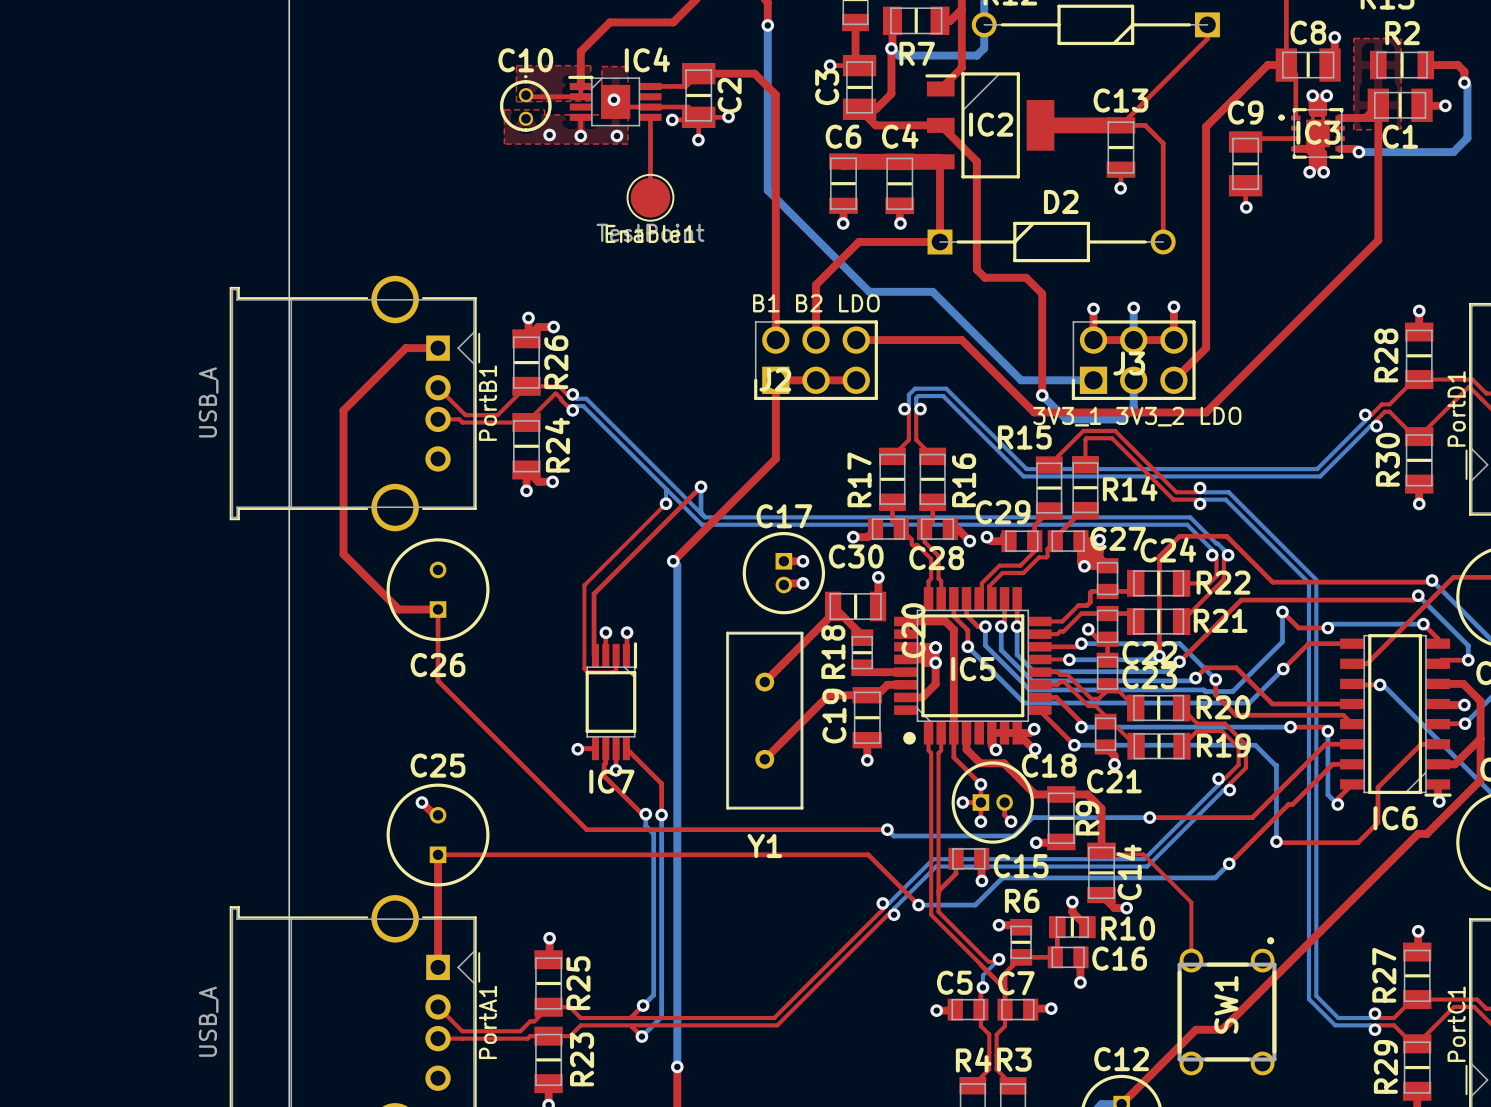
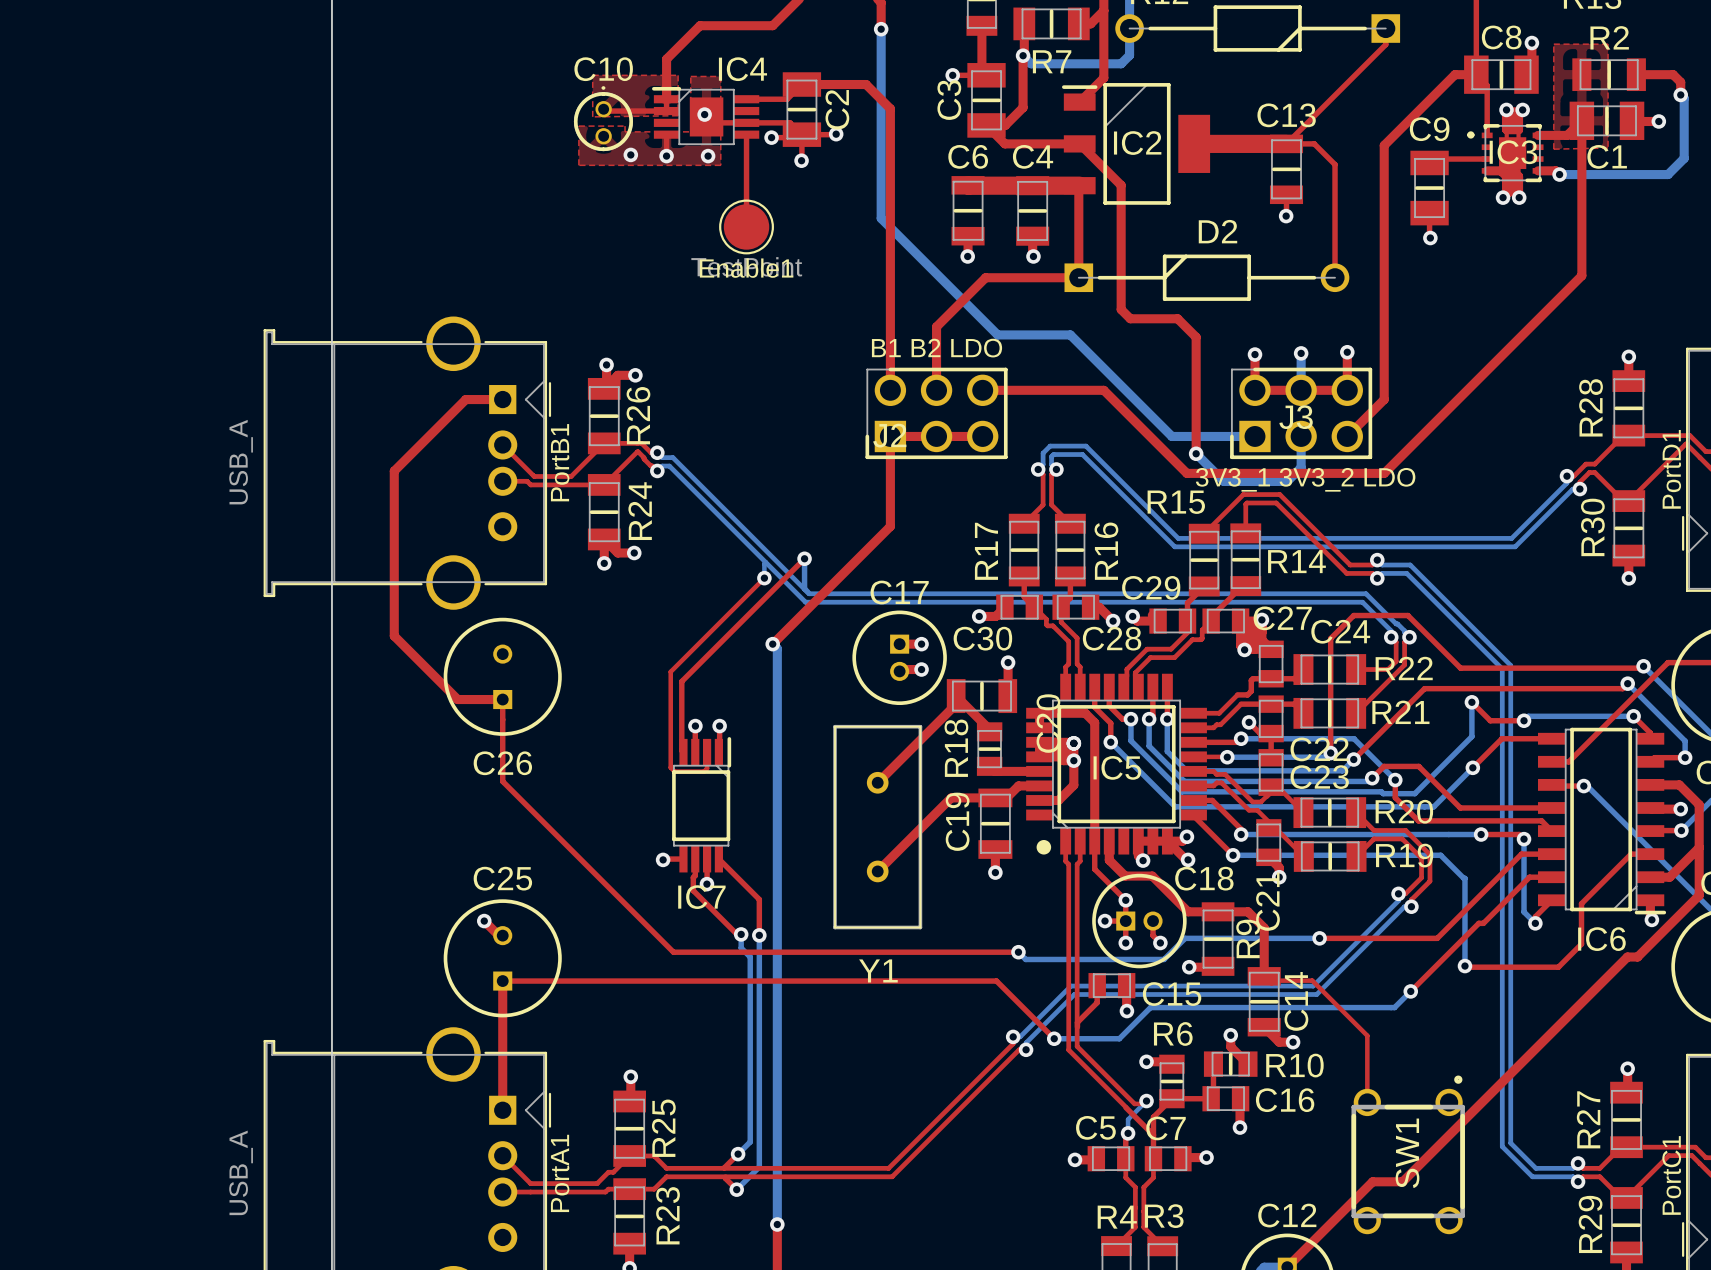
C28 name position: C28 (936, 558) -> C28 (1112, 638)
C21 name rotation: 0° (1114, 781) -> 90° counterclockwise (1267, 901)

